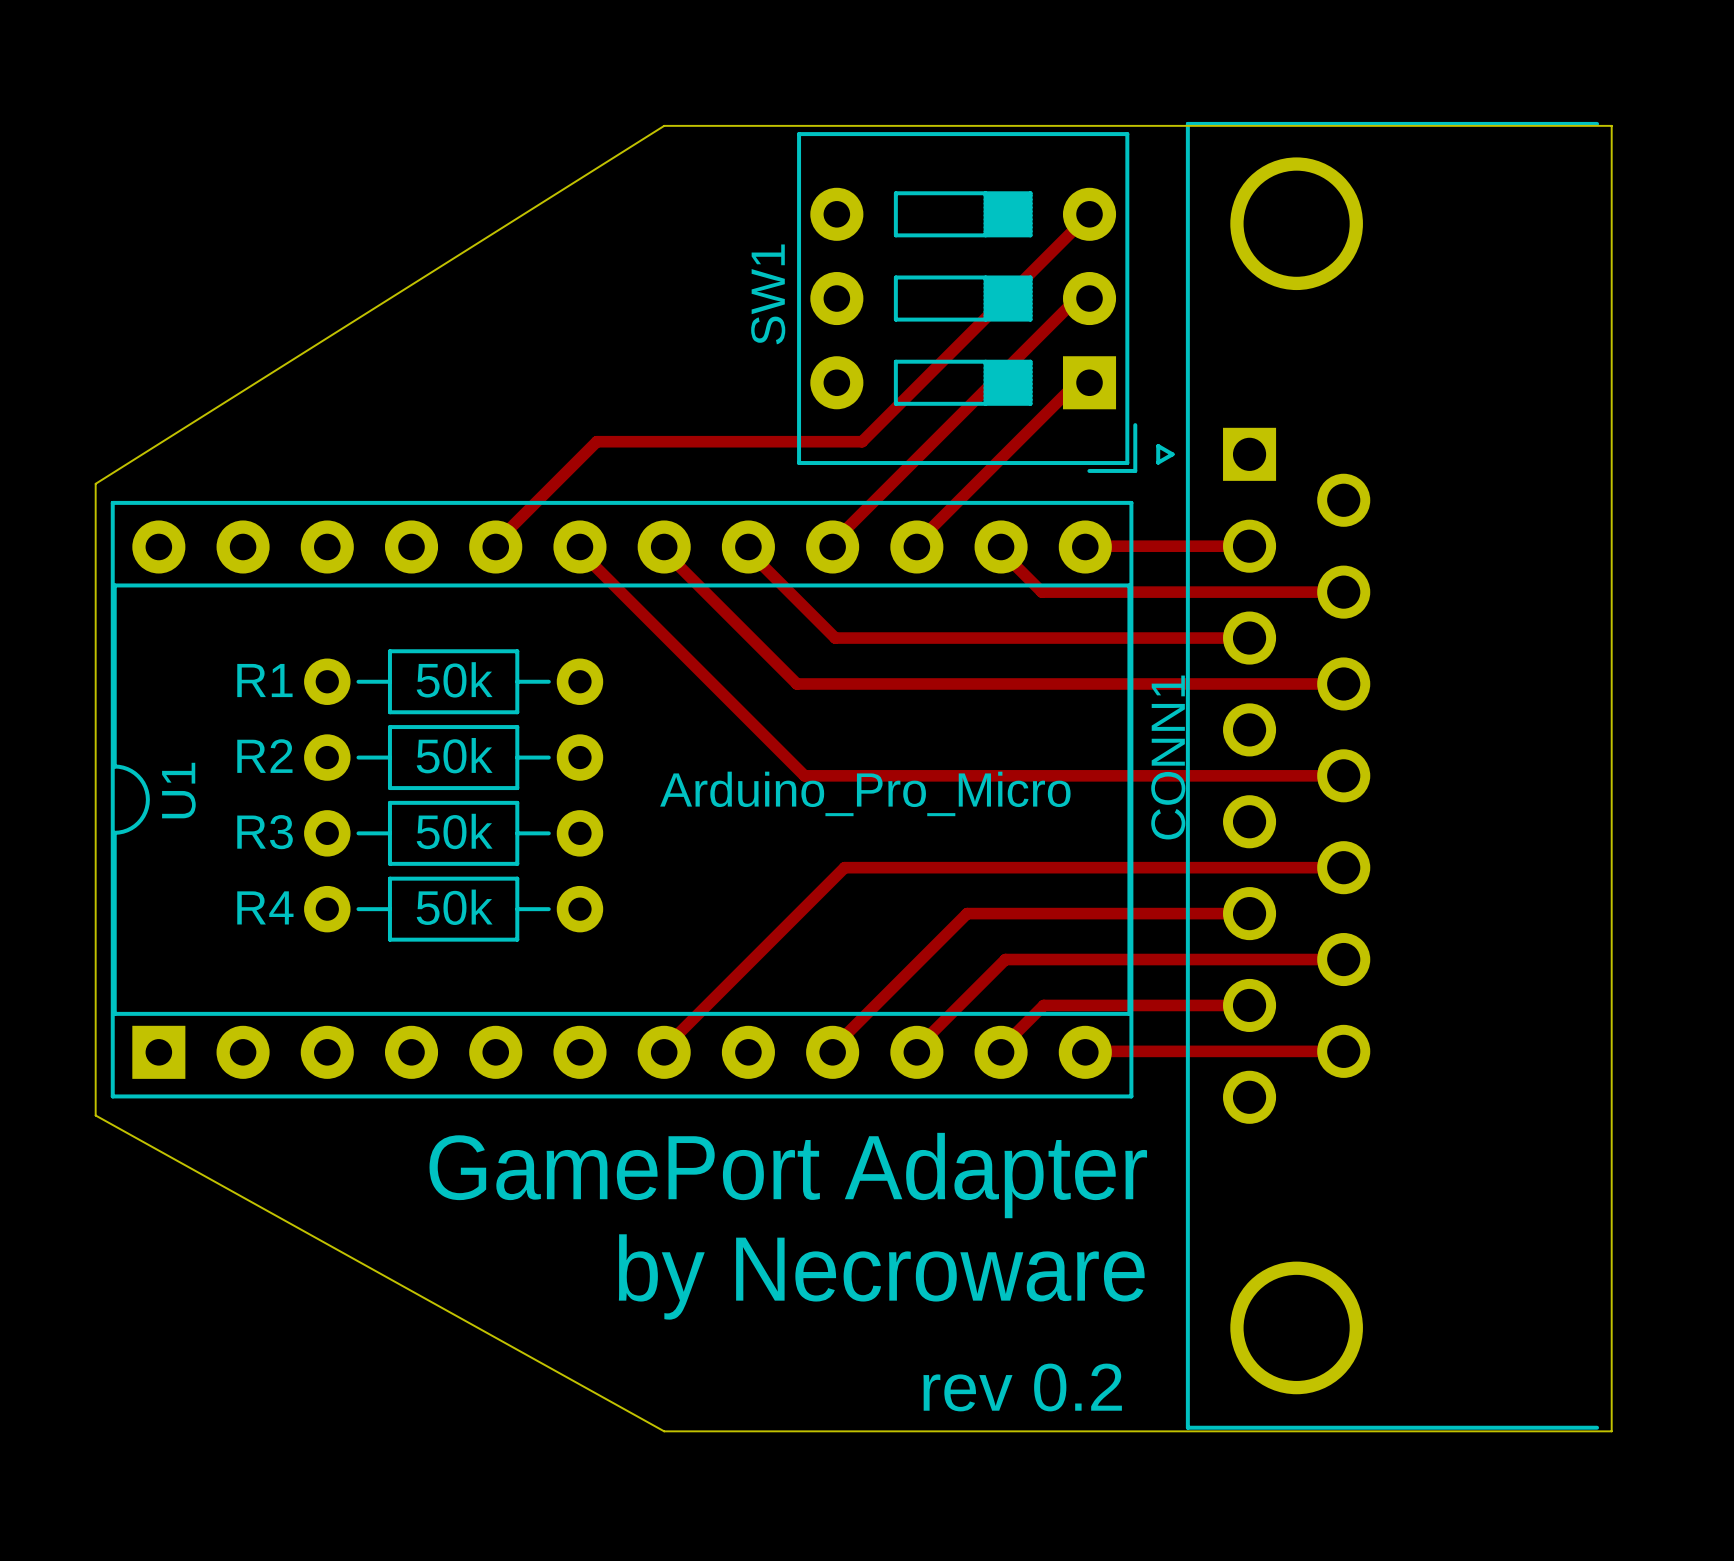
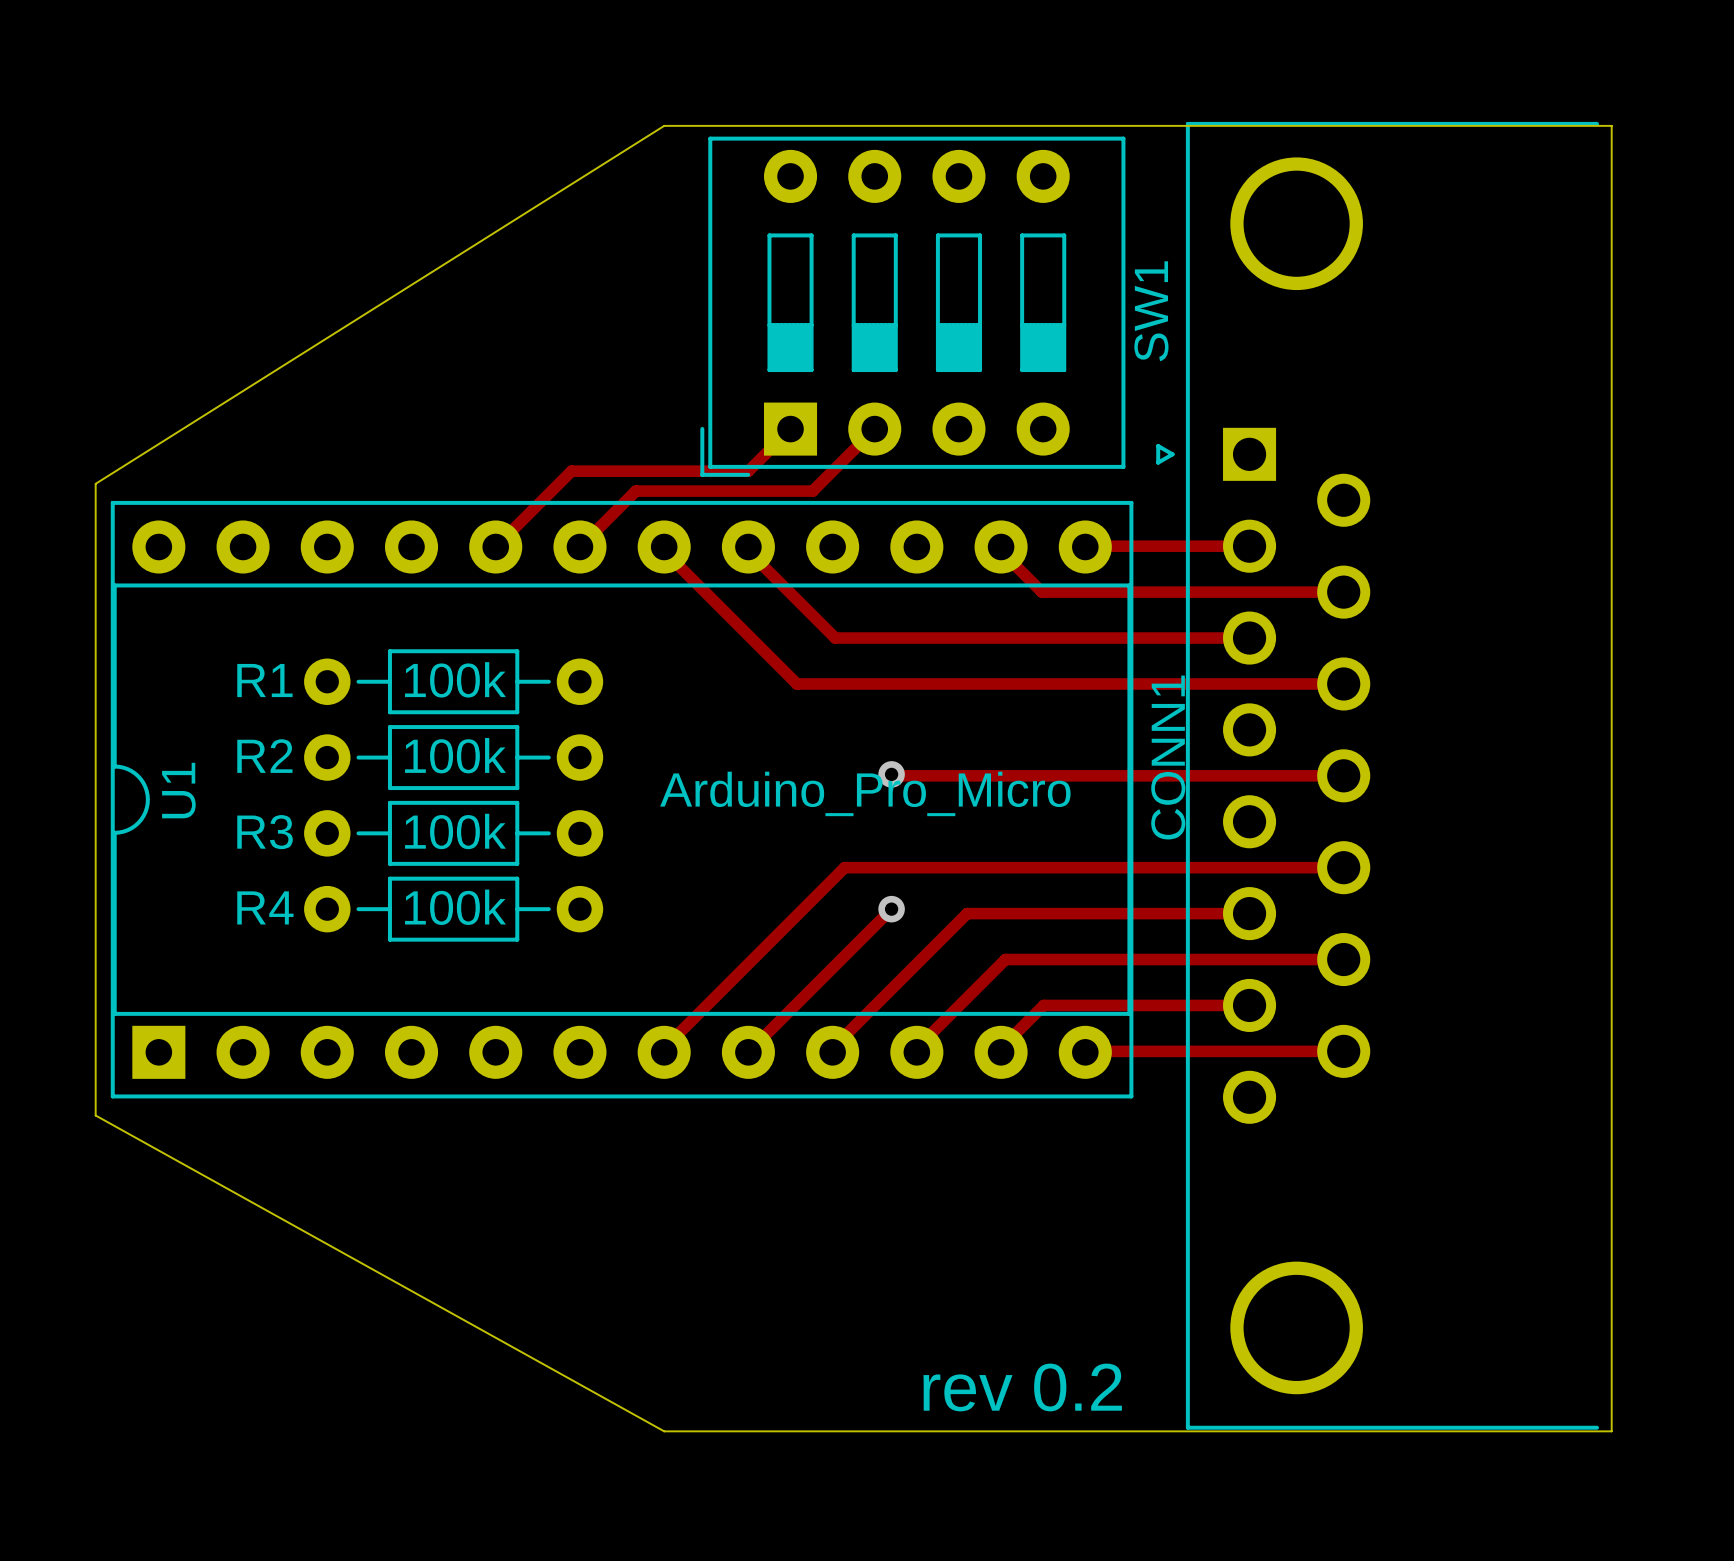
SW1 footprint: [797, 132, 1138, 473] -> [700, 136, 1126, 477]
track: (1089, 214) (874, 429) -> none
SW1 name position: SW1 (768, 294) -> SW1 (1151, 311)
track: (1089, 298) (1076, 298) (828, 546) -> none
track: (1089, 382) (1076, 382) (912, 546) -> none
track: none -> (790, 429) (748, 471) (571, 471) (495, 546)
track: (862, 441) (596, 441) (491, 546) -> (862, 441) (812, 491) (635, 491) (579, 546)
track: (575, 546) (804, 775) (893, 775) -> none
R1 value: 50k (454, 679) -> 100k (455, 679)
R2 value: 50k (454, 755) -> 100k (455, 755)
via: none -> (891, 774)
R3 value: 50k (454, 831) -> 100k (455, 831)
R4 value: 50k (454, 907) -> 100k (455, 907)
track: none -> (891, 909) (748, 1052)
via: none -> (891, 909)
text: GamePort Adapter (788, 1175) -> none
text: by Necroware (881, 1276) -> none

